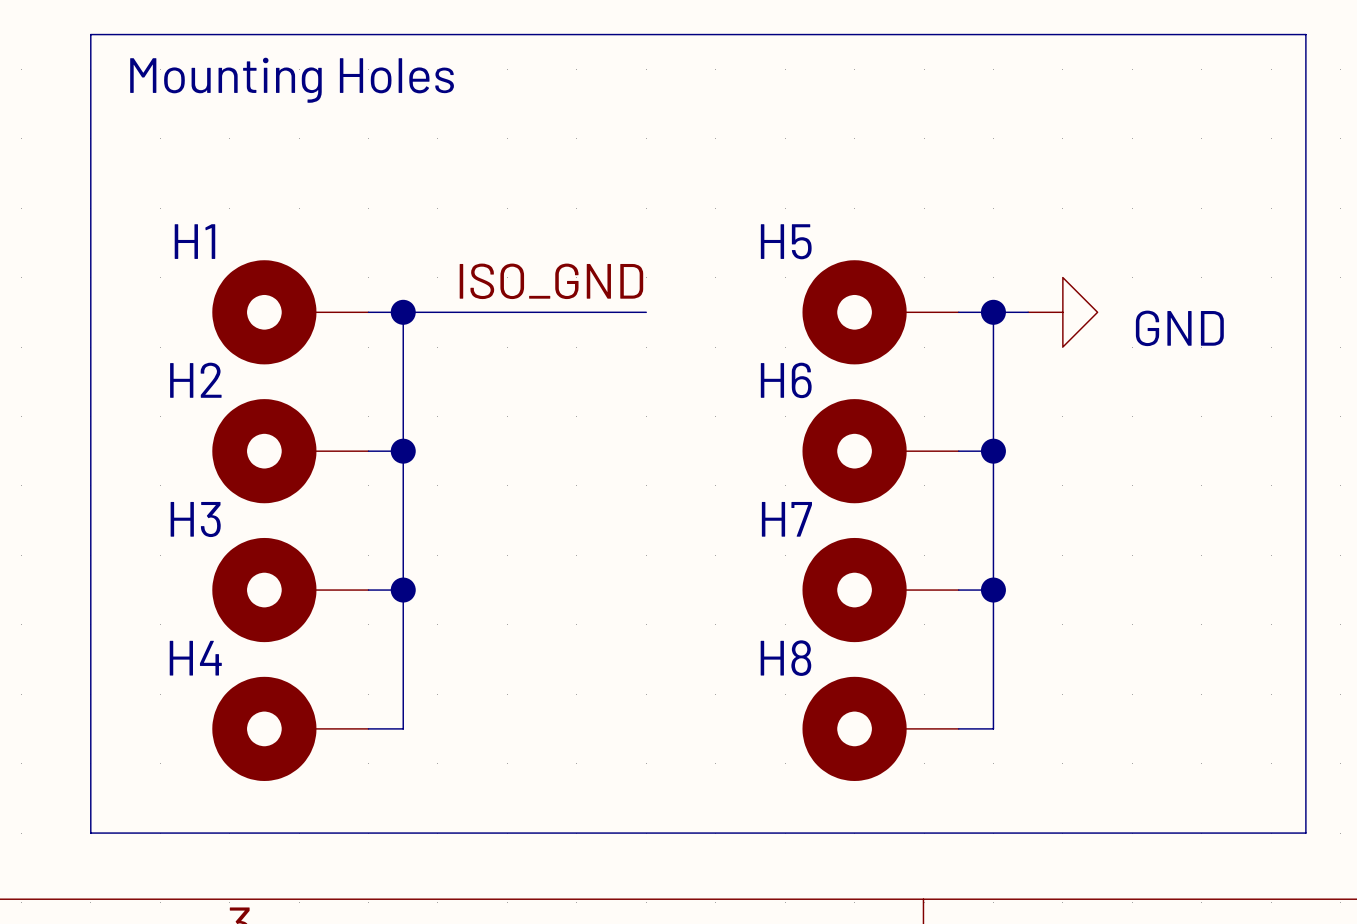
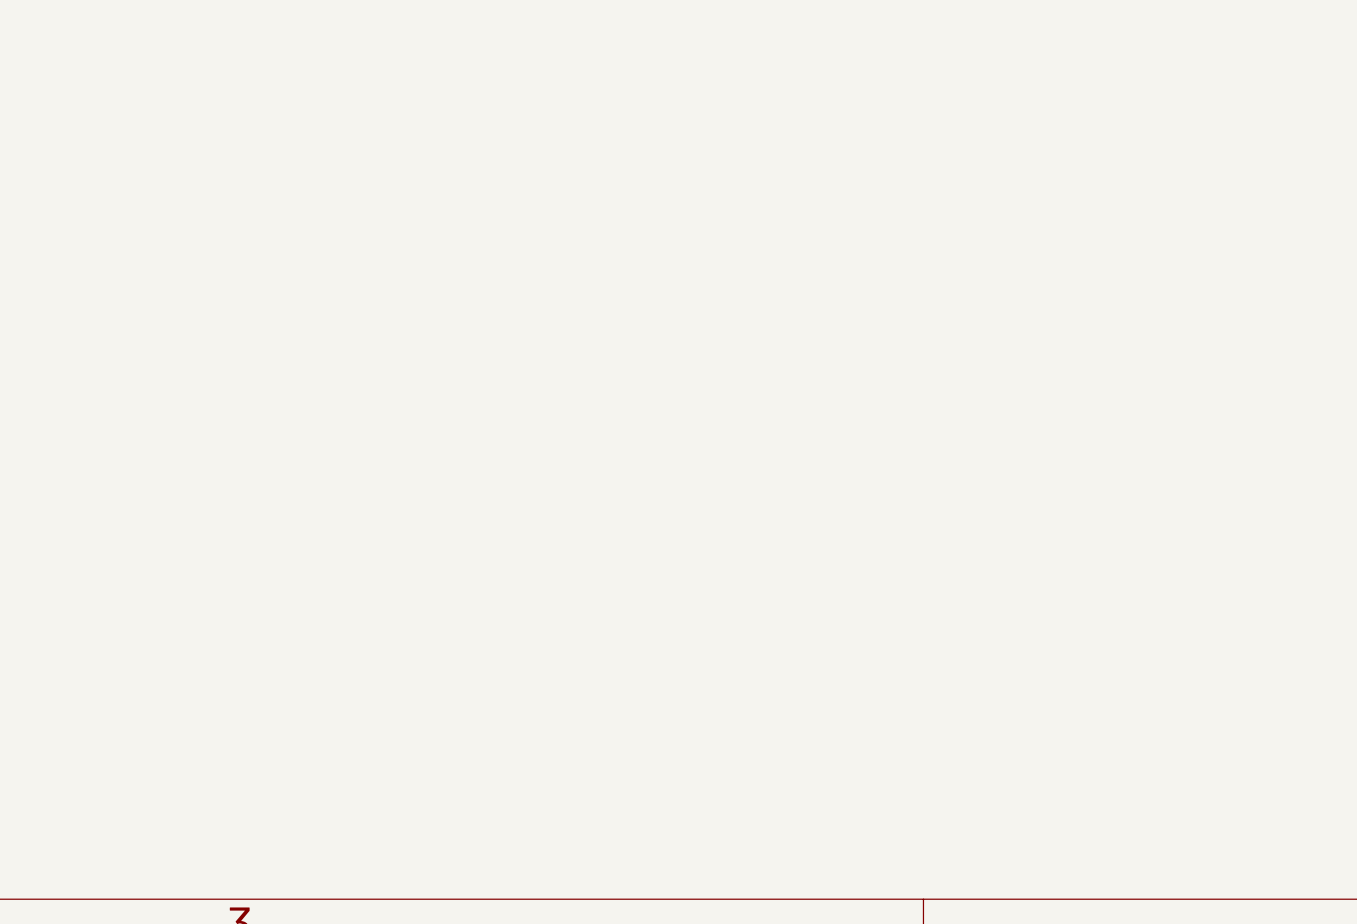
line: (90, 34) (1305, 34) (1305, 833) (90, 833) (90, 34) -> none
text: Mounting Holes (292, 80) -> none
label: ISO_GND (551, 281) -> none
H1: (290, 312) -> none
wire: (368, 312) (646, 312) -> none
wire: (403, 312) (403, 728) (368, 728) -> none
junction: (403, 312) -> none
H5: (880, 312) -> none
wire: (958, 312) (1028, 312) -> none
wire: (993, 312) (993, 728) (958, 728) -> none
junction: (993, 312) -> none
power symbol: GND (1062, 312) -> none
H2: (290, 451) -> none
wire: (368, 451) (403, 451) -> none
junction: (403, 451) -> none
H6: (880, 451) -> none
wire: (958, 451) (993, 451) -> none
junction: (993, 451) -> none
H3: (290, 590) -> none
wire: (368, 590) (403, 590) -> none
junction: (403, 590) -> none
H7: (880, 590) -> none
wire: (958, 590) (993, 590) -> none
junction: (993, 590) -> none
H4: (290, 728) -> none
H8: (880, 728) -> none

